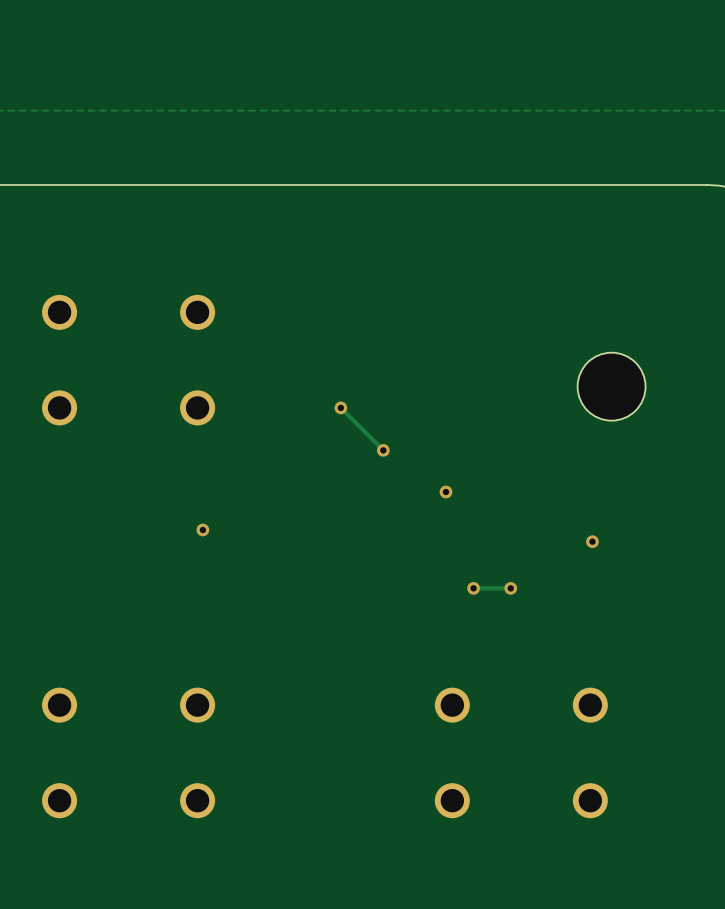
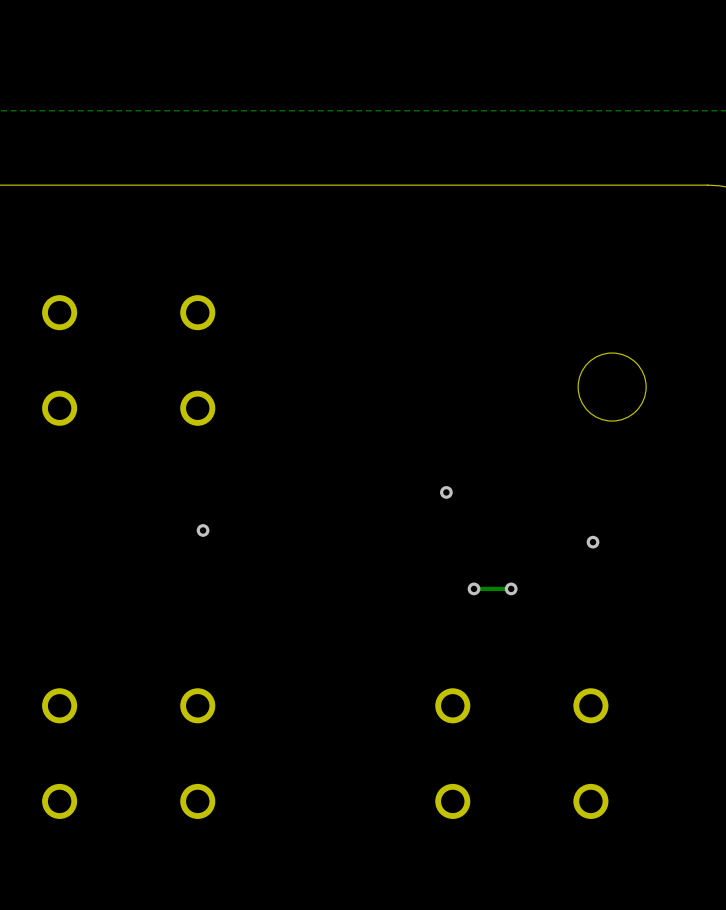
track: (340, 407) (383, 450) -> none
via: (340, 407) -> none
via: (383, 450) -> none

